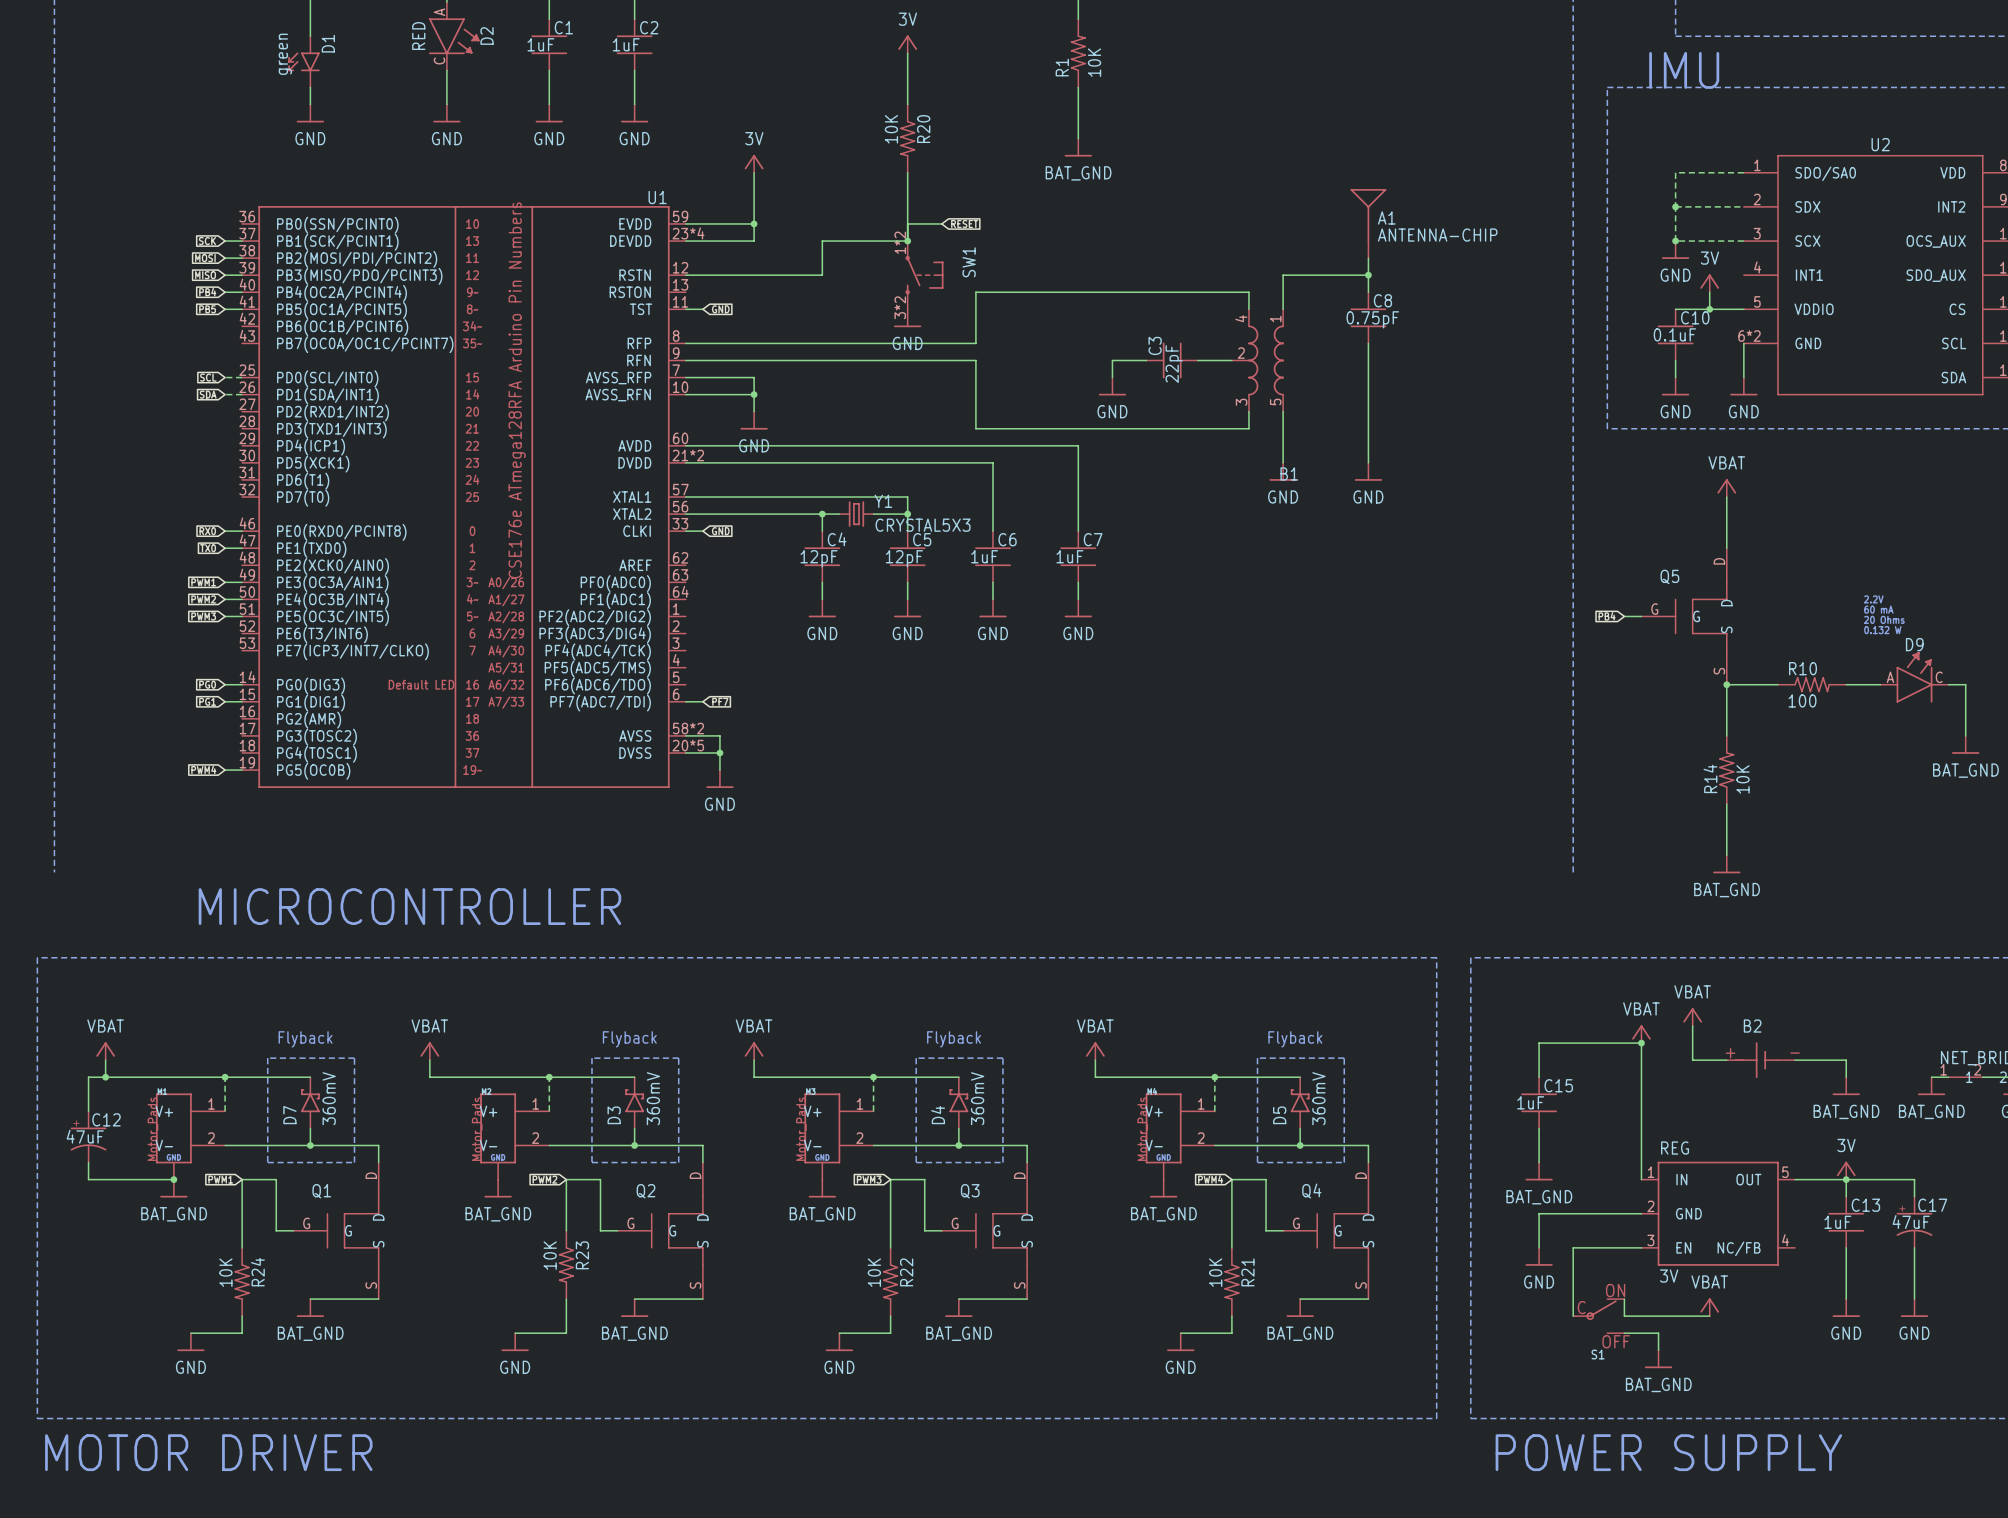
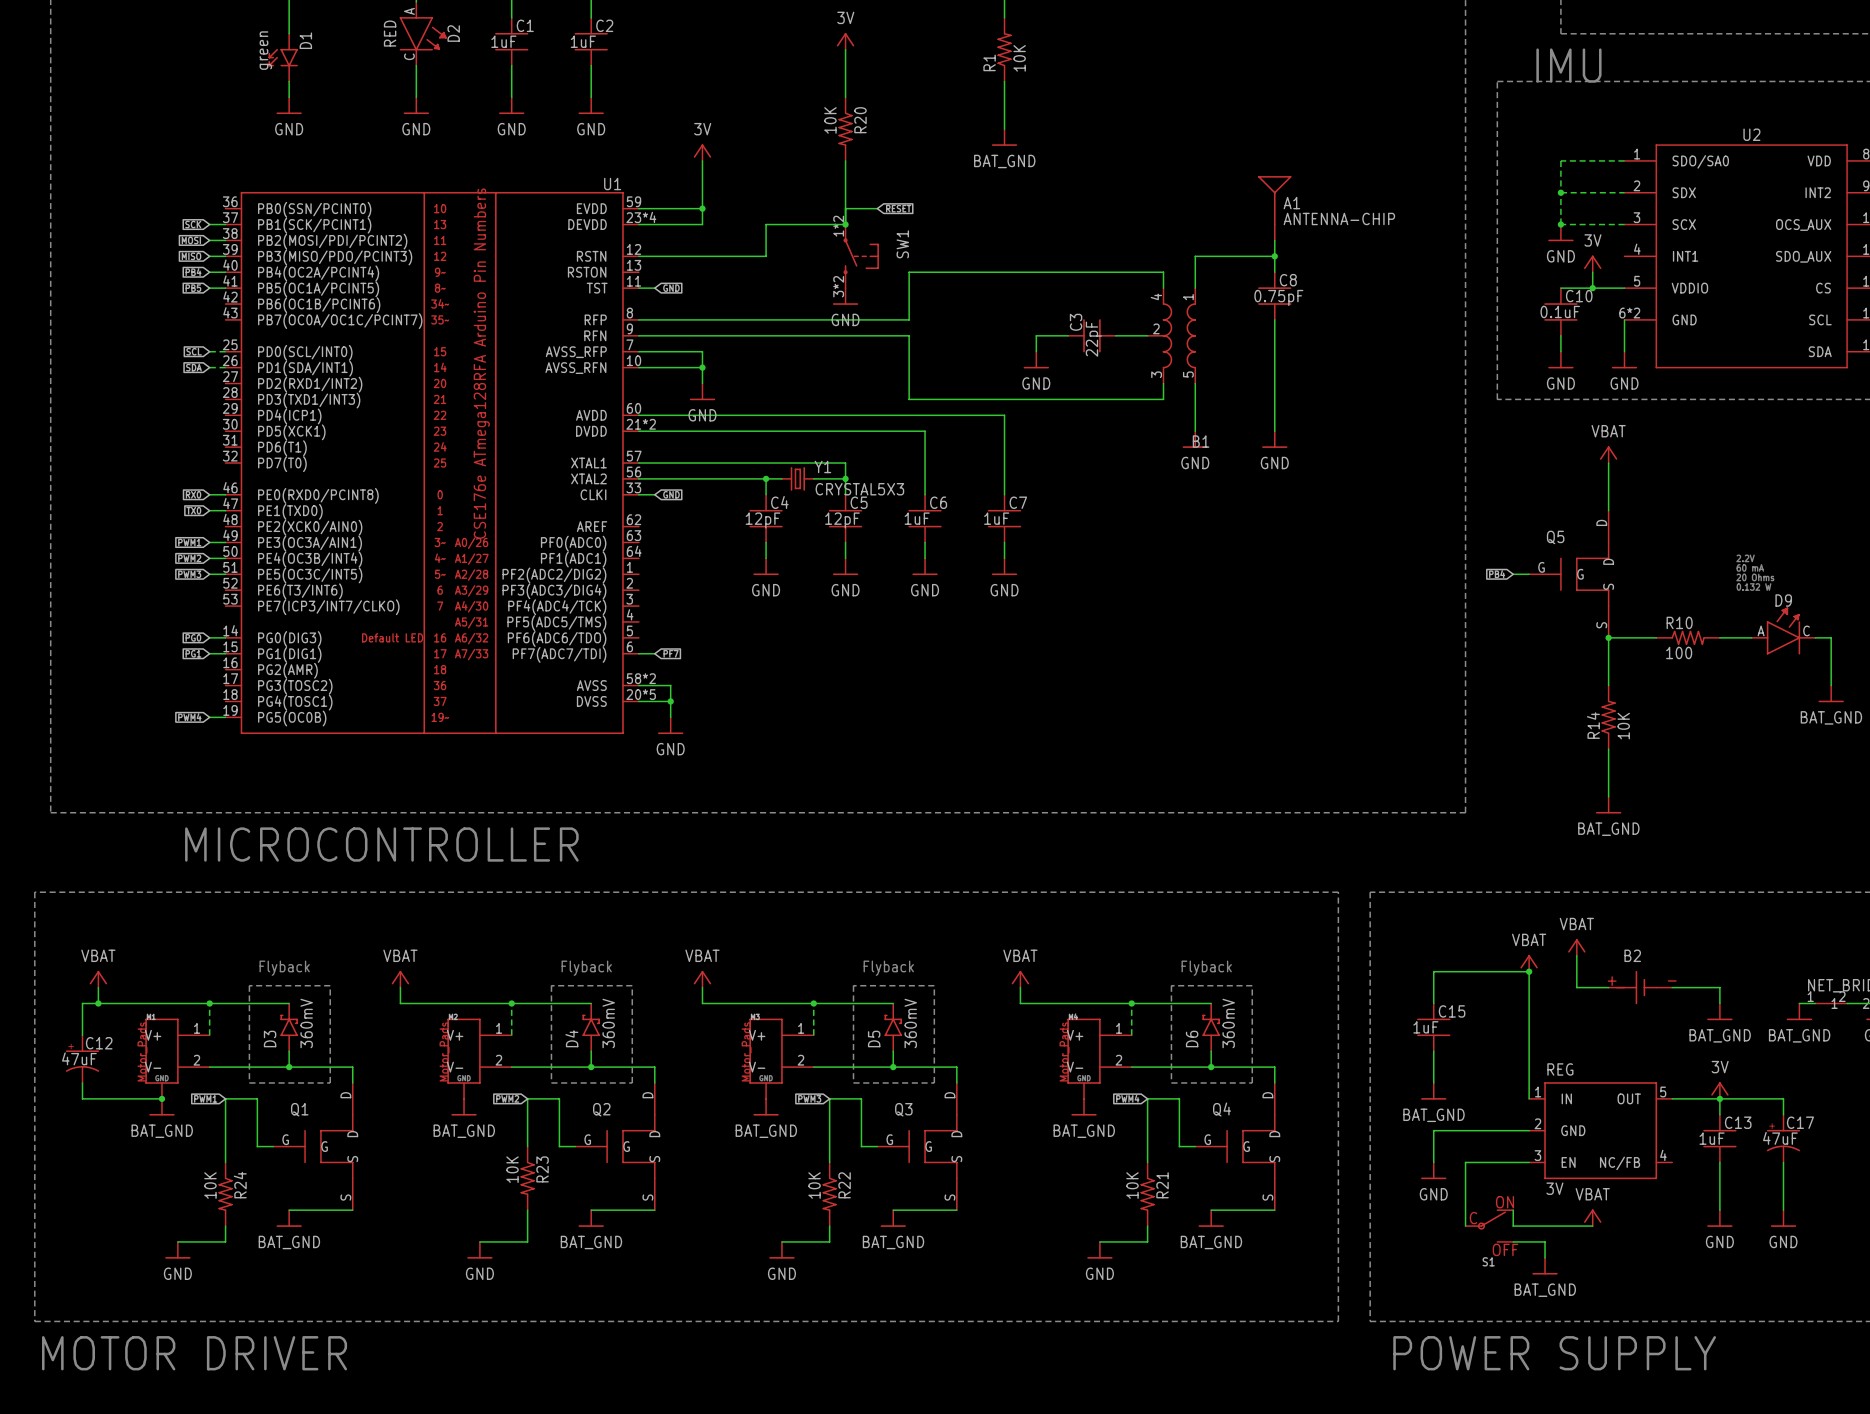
line: none -> (50, 812) (1465, 812)
D7 name: D7 (289, 1115) -> D3 (270, 1039)
D3 name: D3 (614, 1115) -> D4 (571, 1038)
D4 name: D4 (938, 1115) -> D5 (874, 1039)
D5 name: D5 (1279, 1115) -> D6 (1192, 1039)

